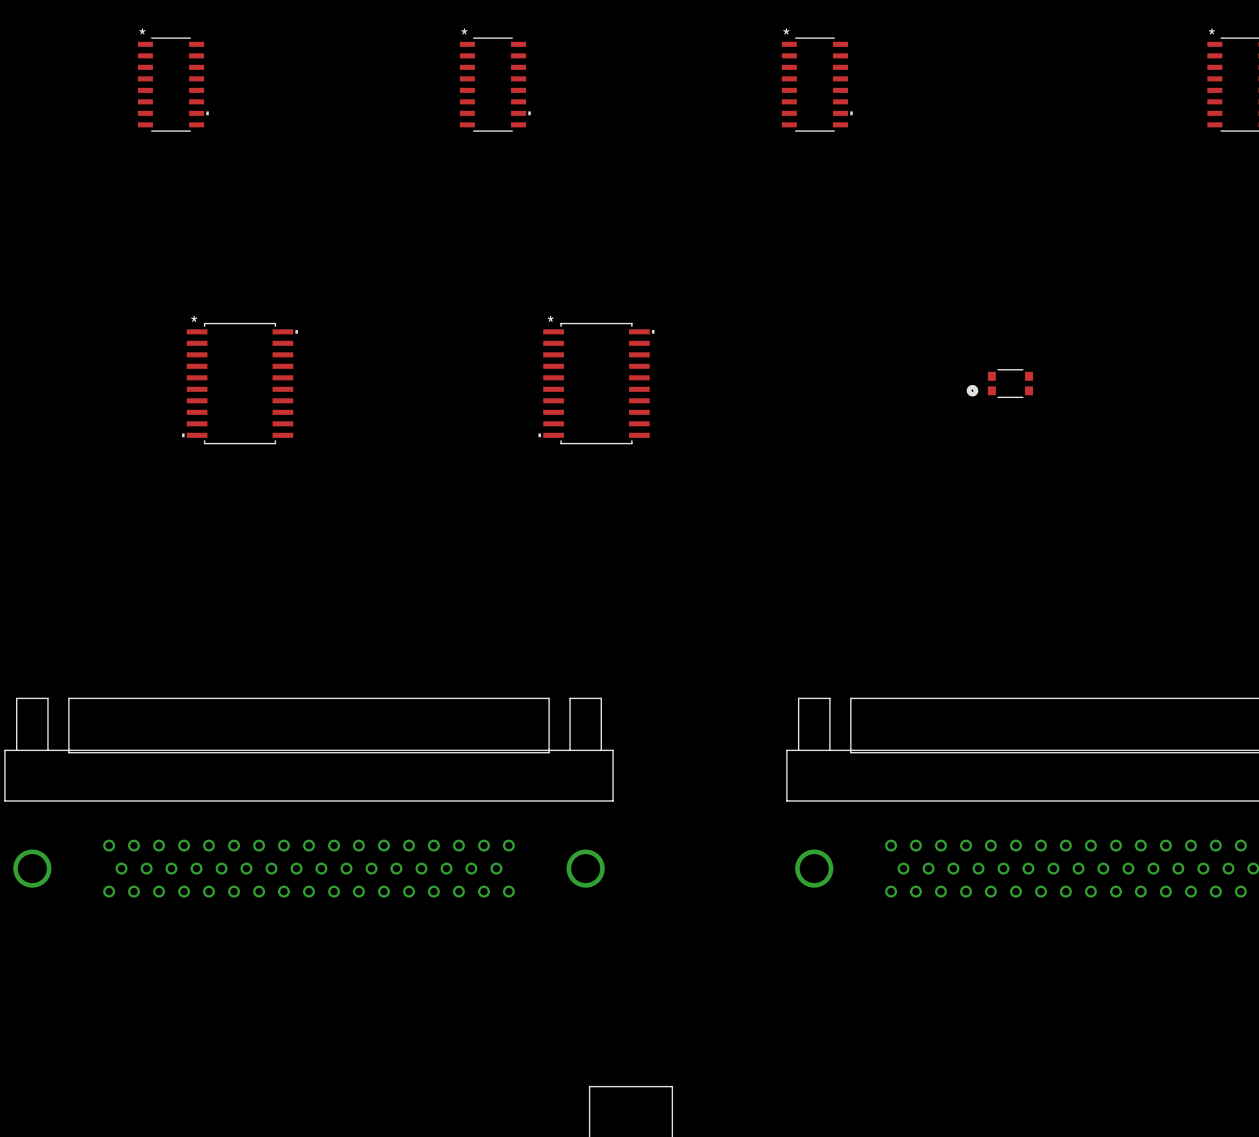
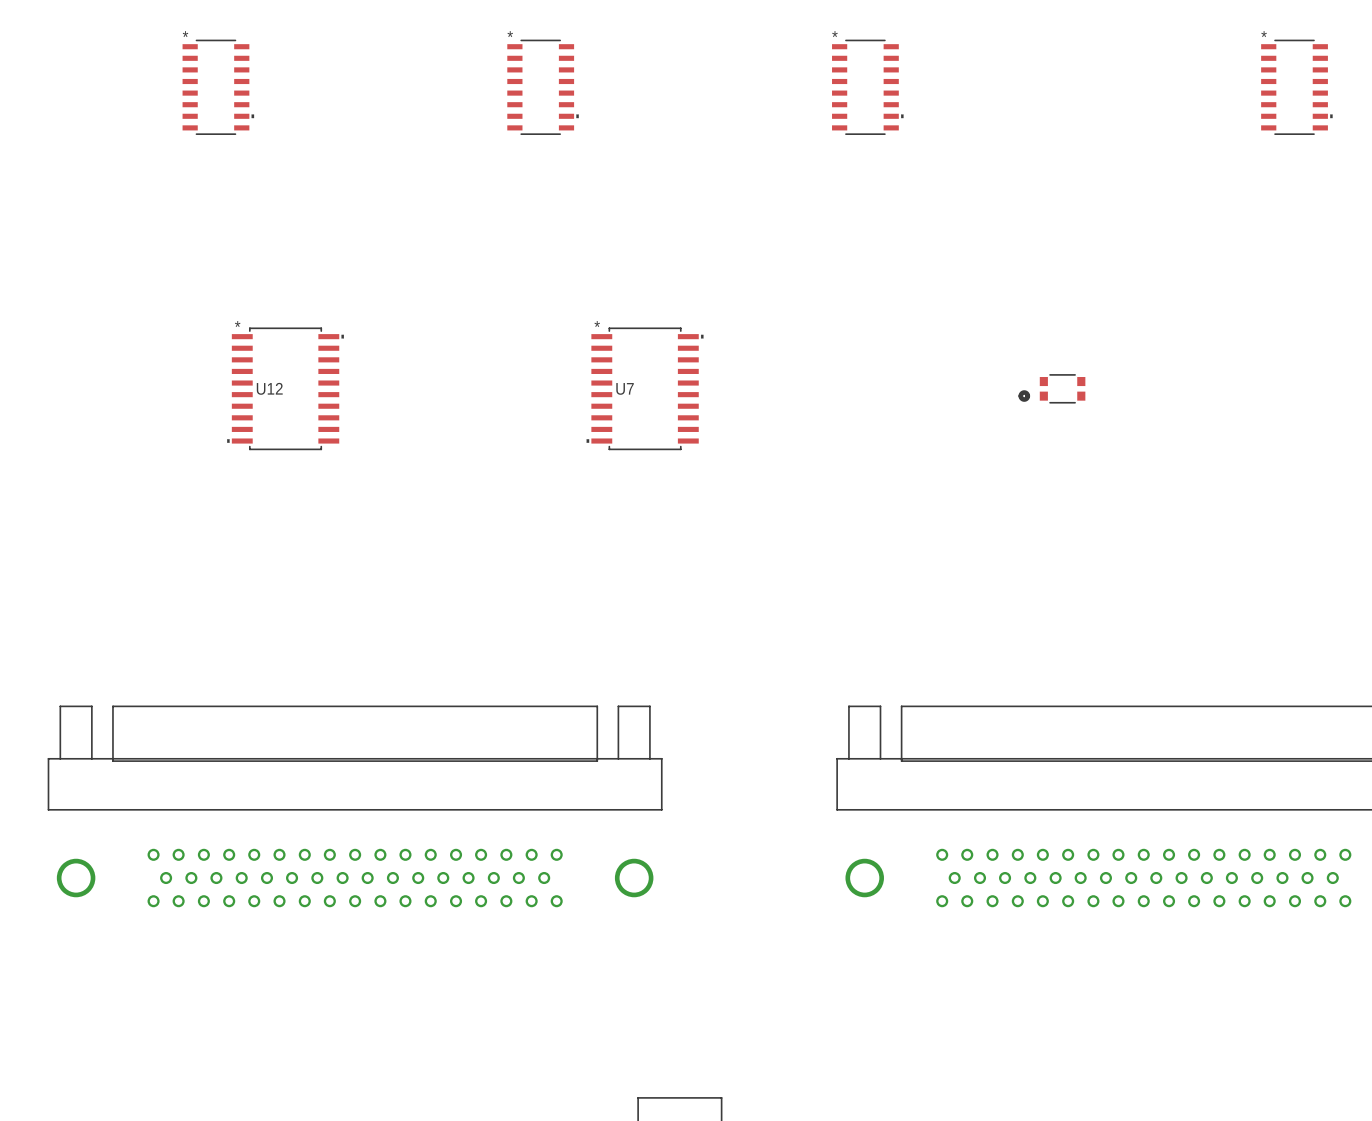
U12 name: none -> U12 (269, 388)
U7 name: none -> U7 (625, 388)

